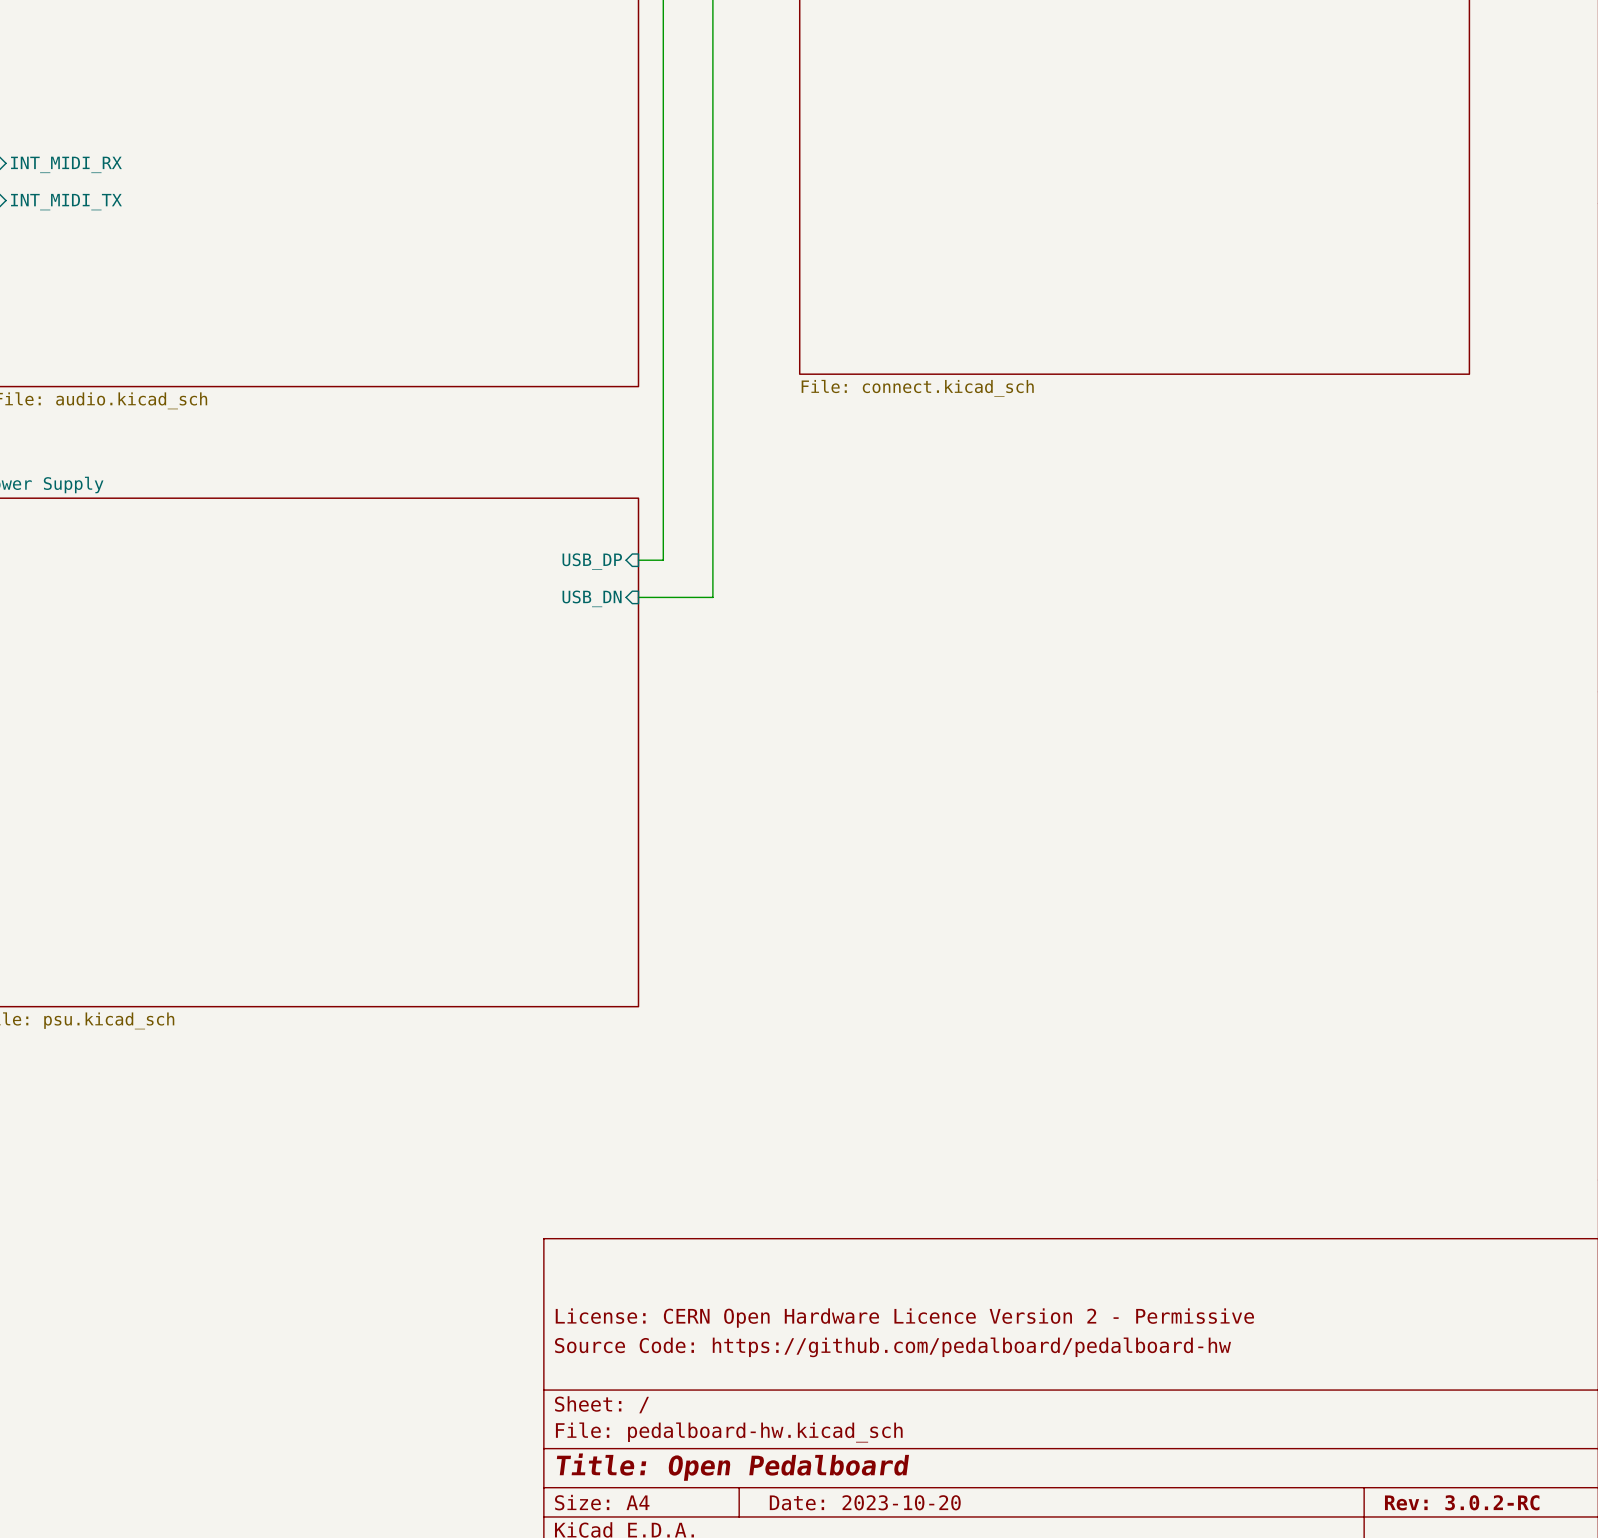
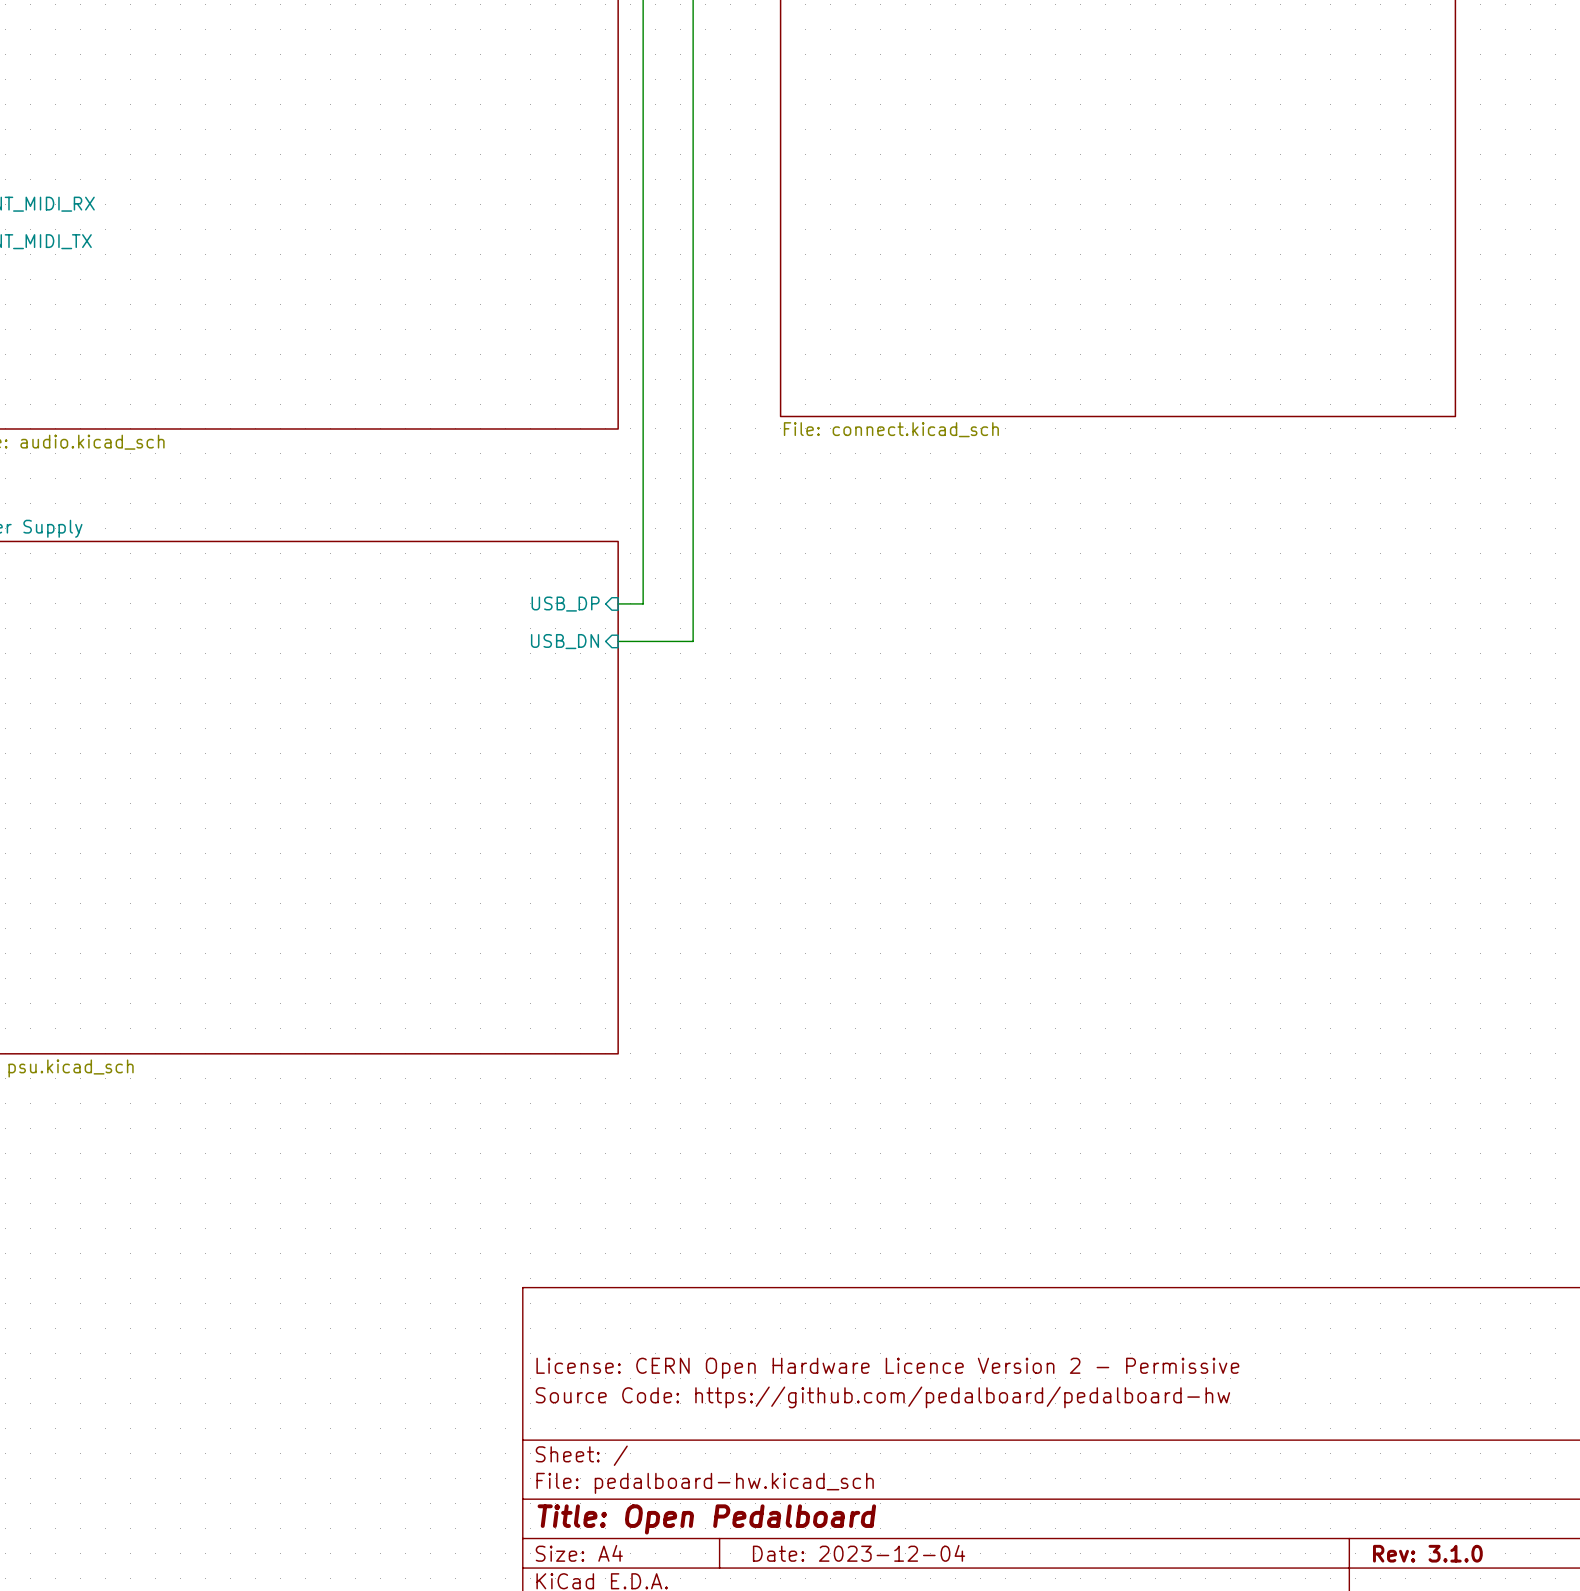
title block: Date: 2023-10-20 (865, 1502) -> Date: 2023-12-04 (859, 1553)
title block: Rev: 3.0.2-RC (1462, 1502) -> Rev: 3.1.0 (1427, 1553)

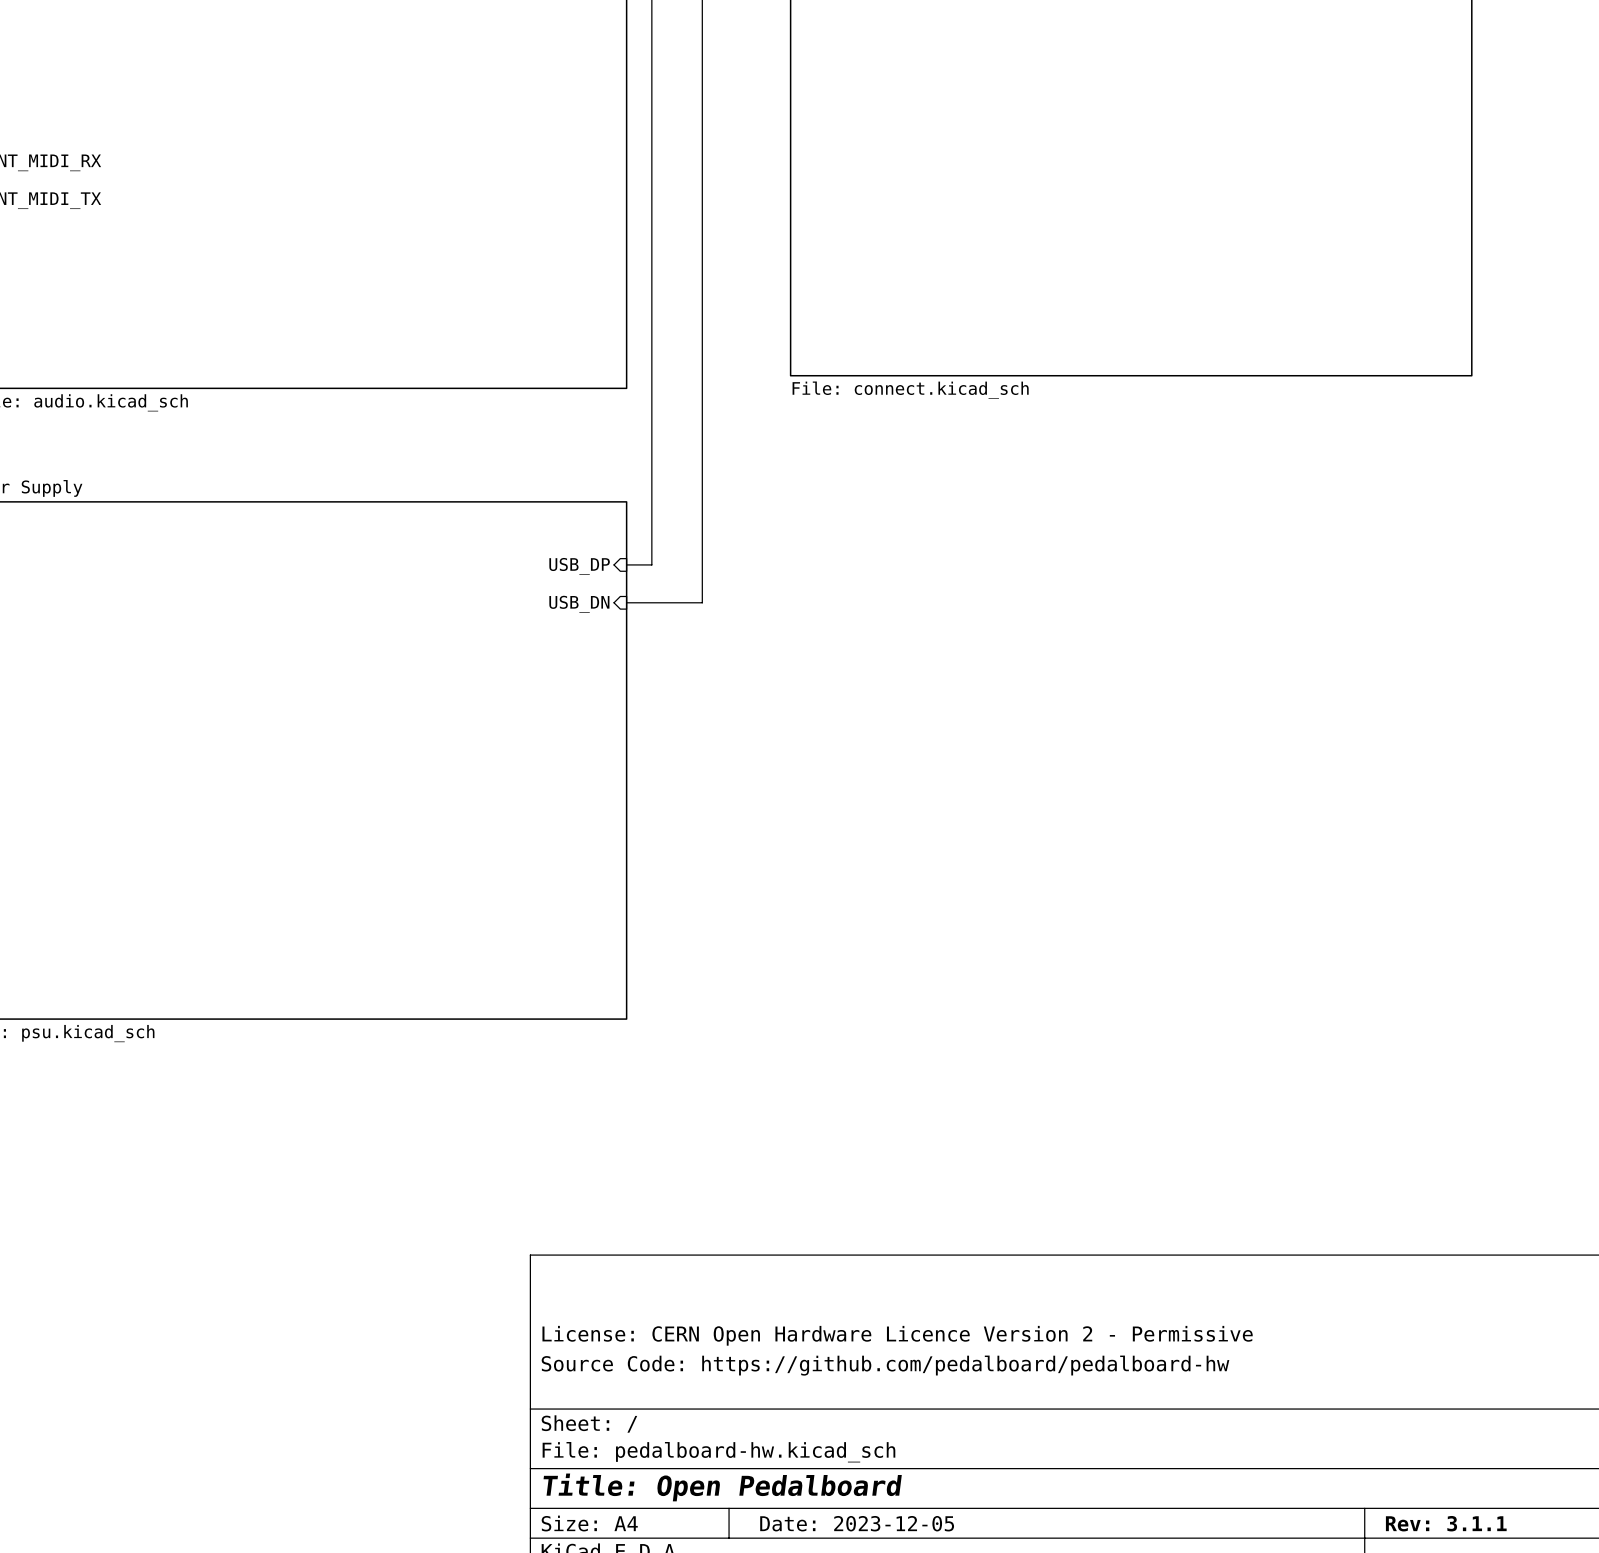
title block: Date: 2023-12-04 (859, 1553) -> Date: 2023-12-05 (857, 1523)
title block: Rev: 3.1.0 (1427, 1553) -> Rev: 3.1.1 (1446, 1523)

